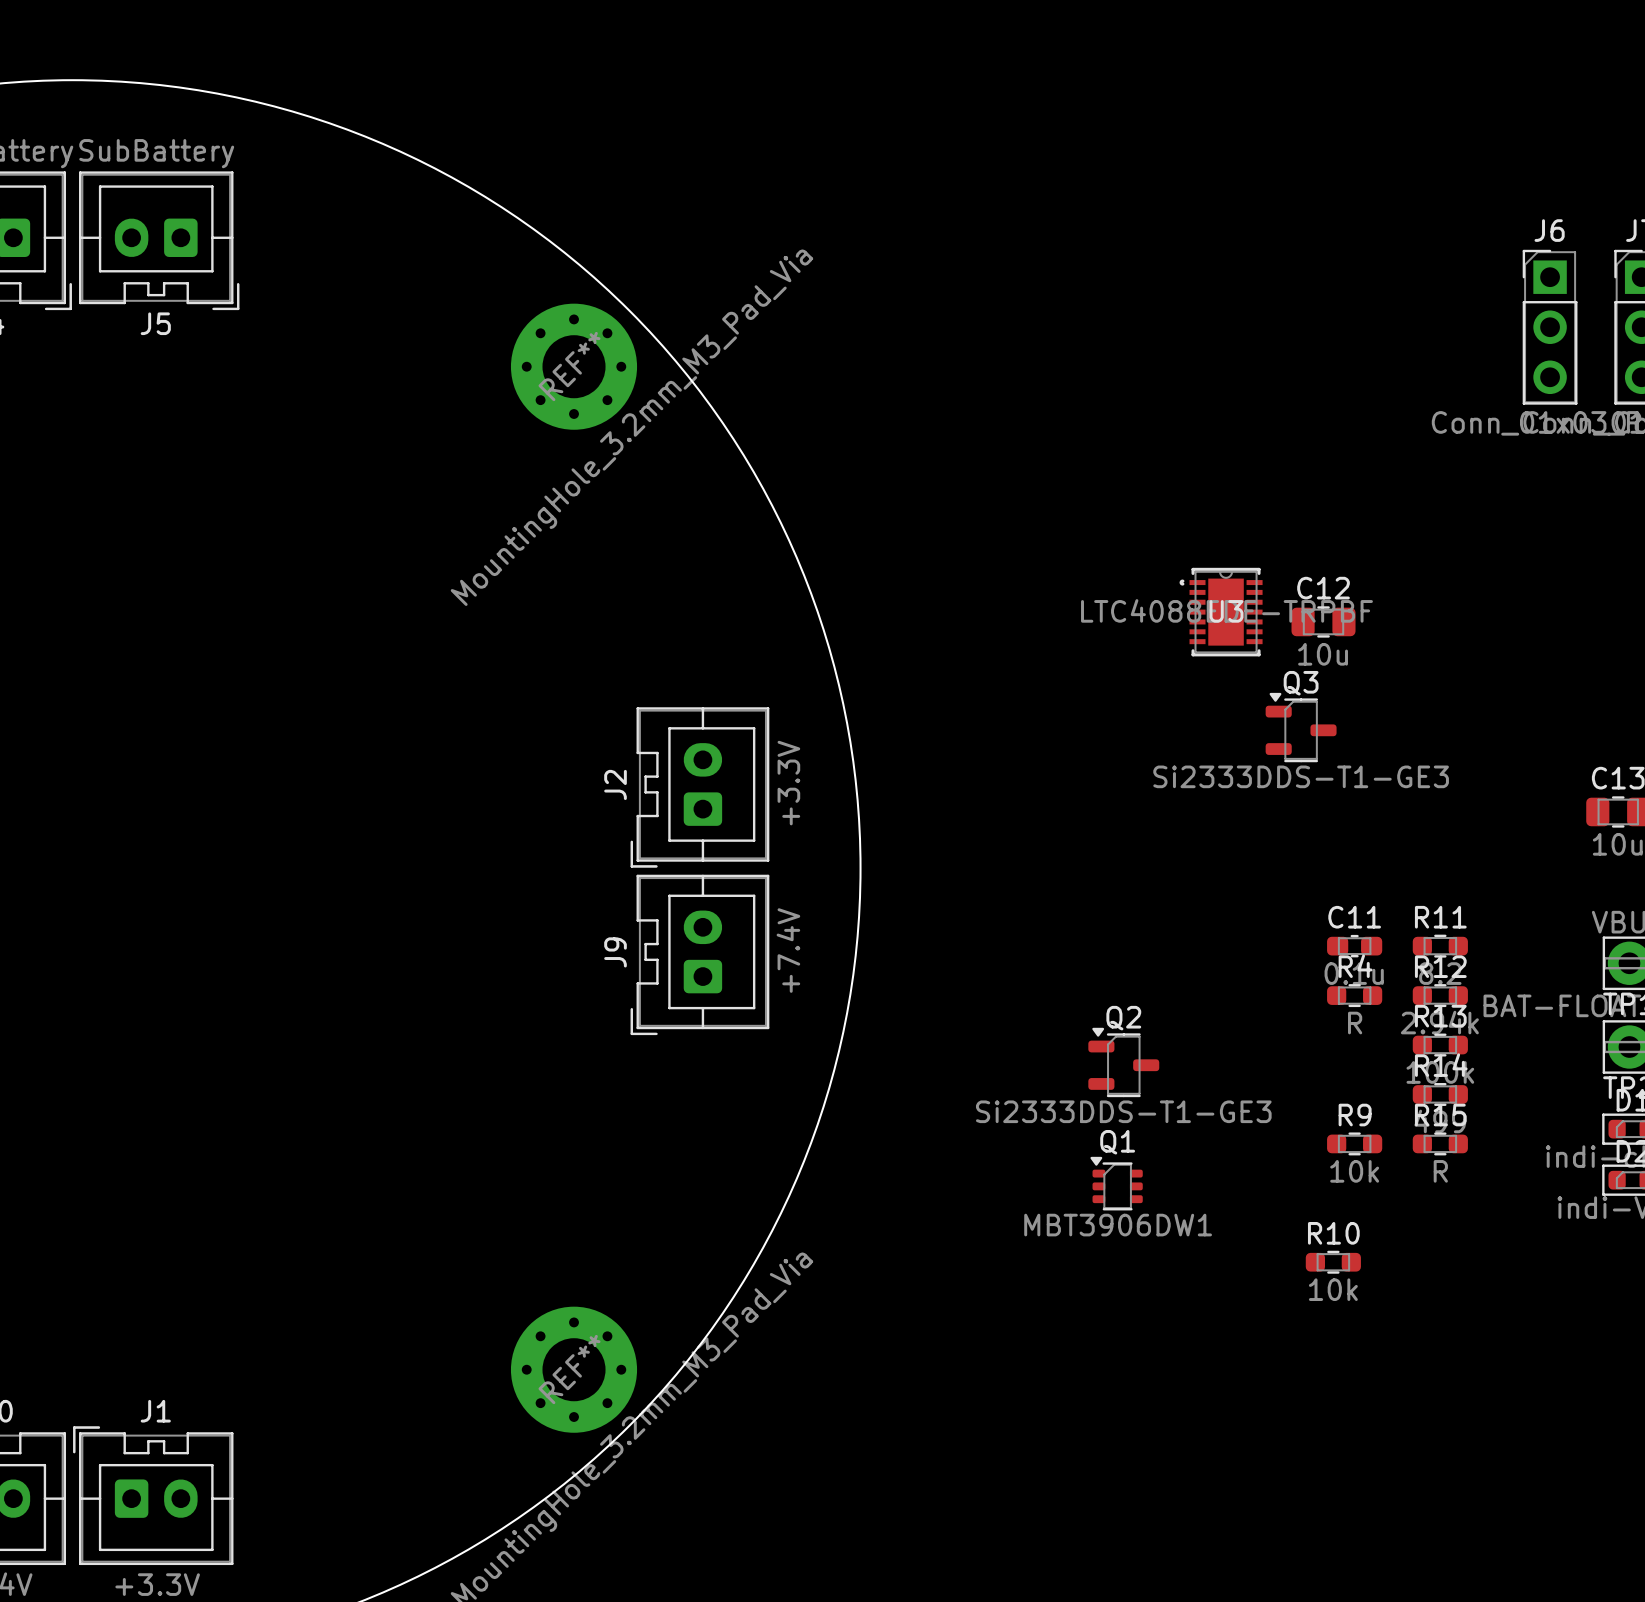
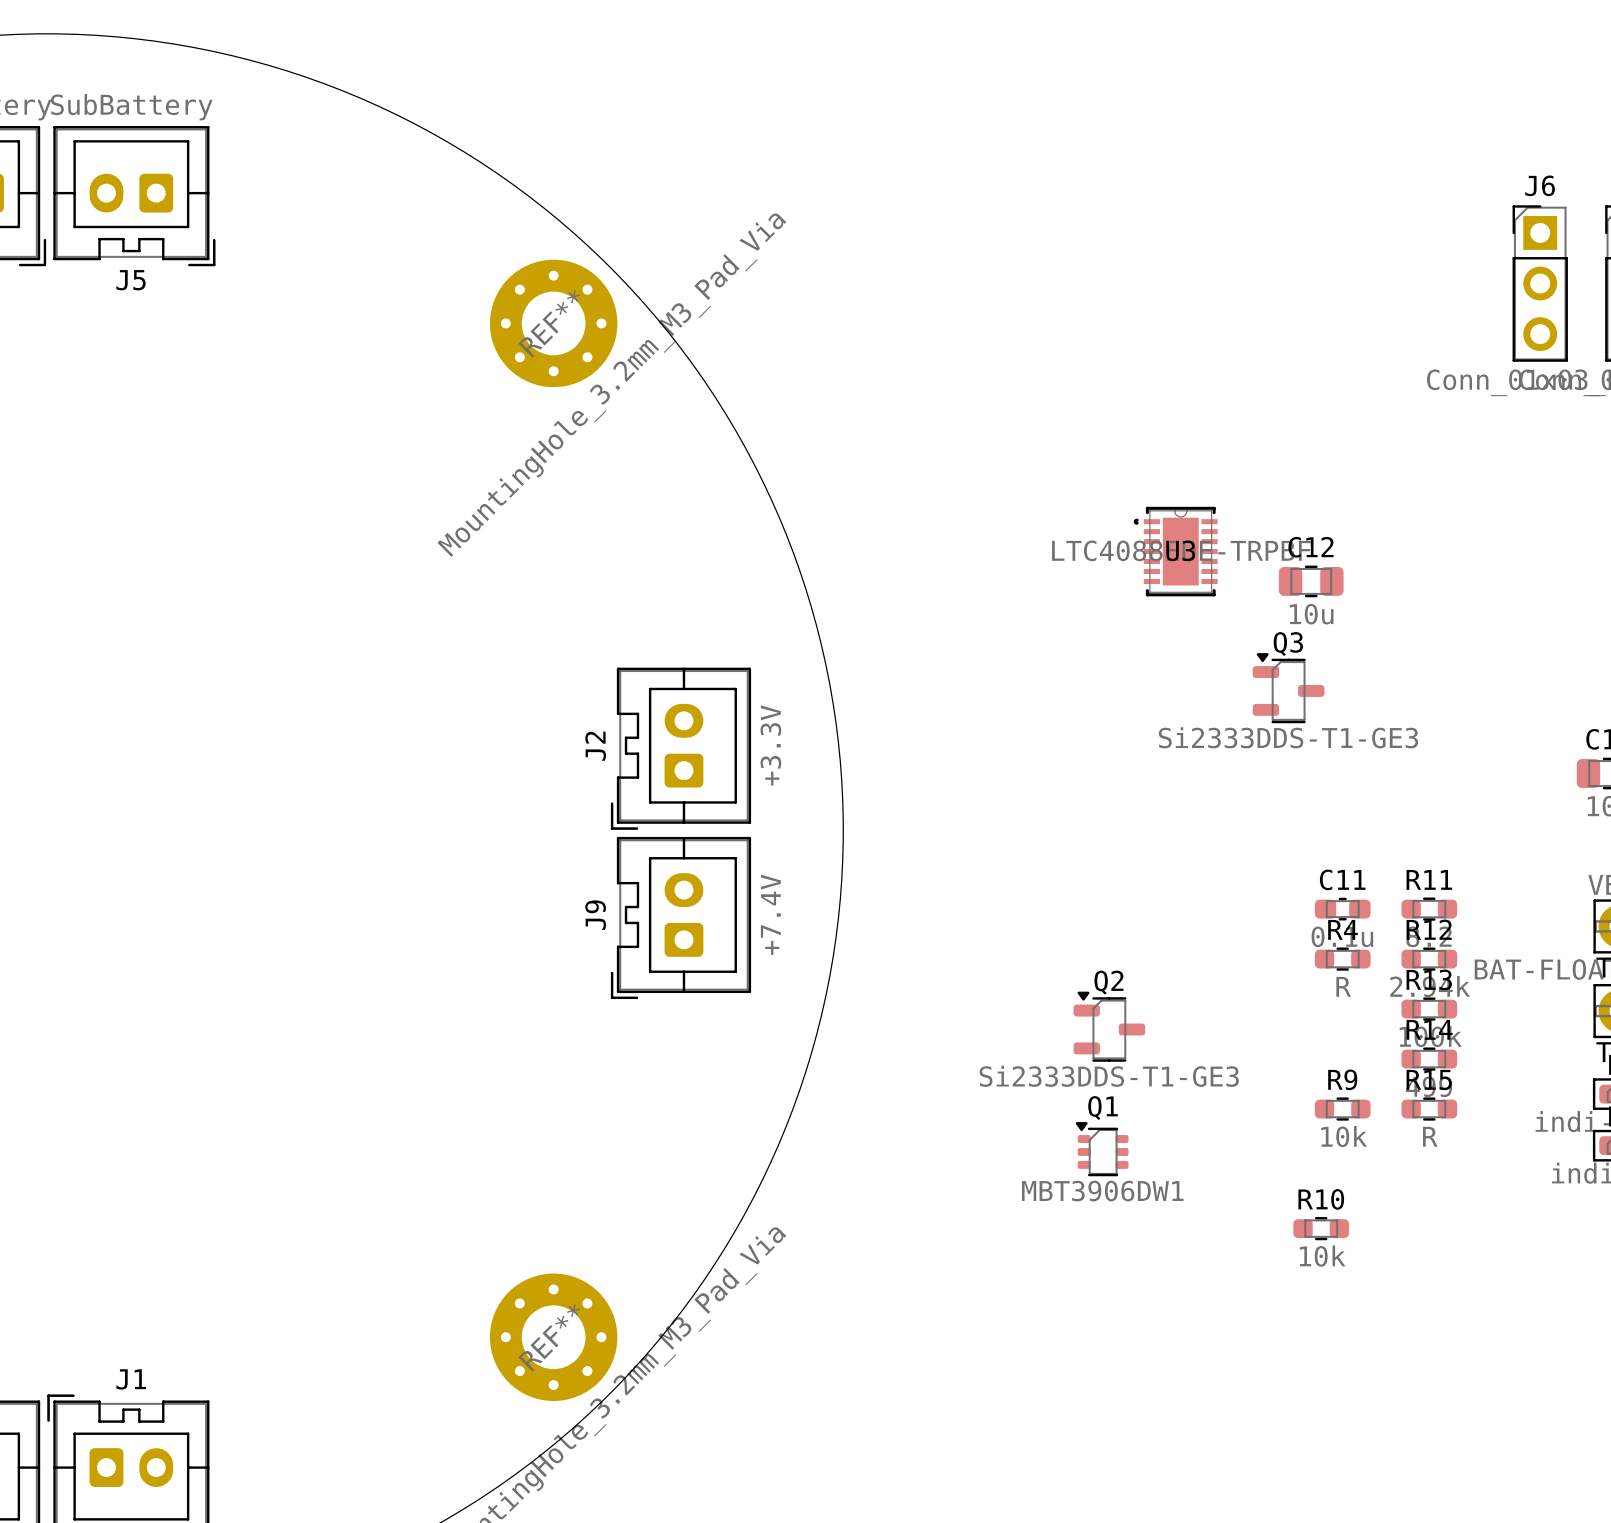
U3 position: (1221, 612) -> (1175, 551)

